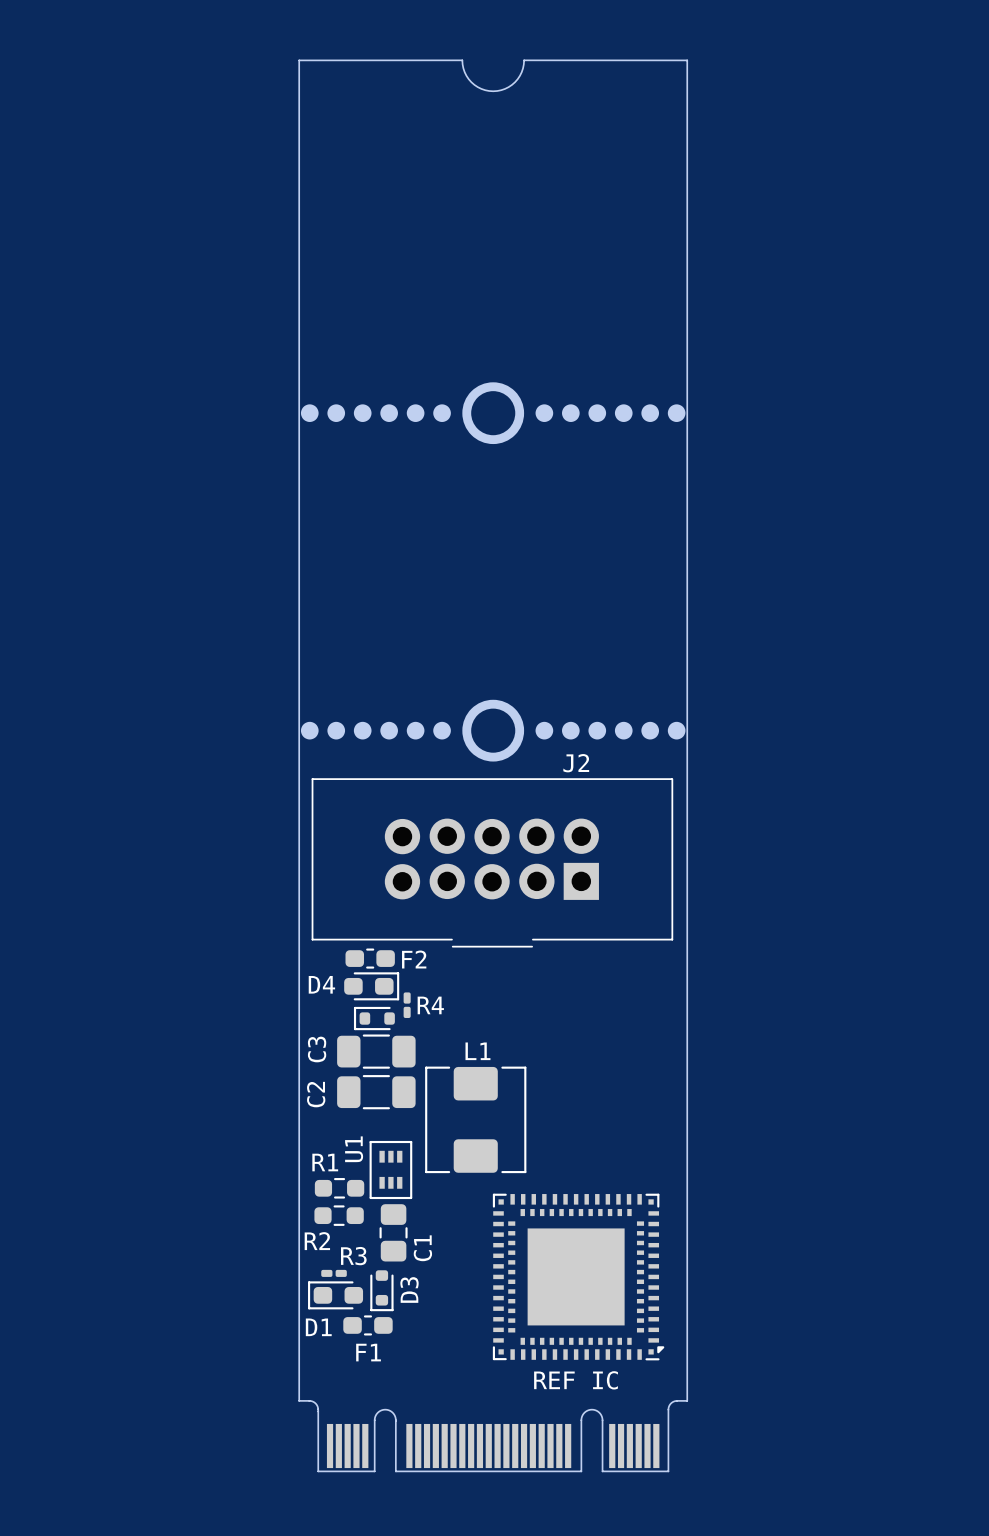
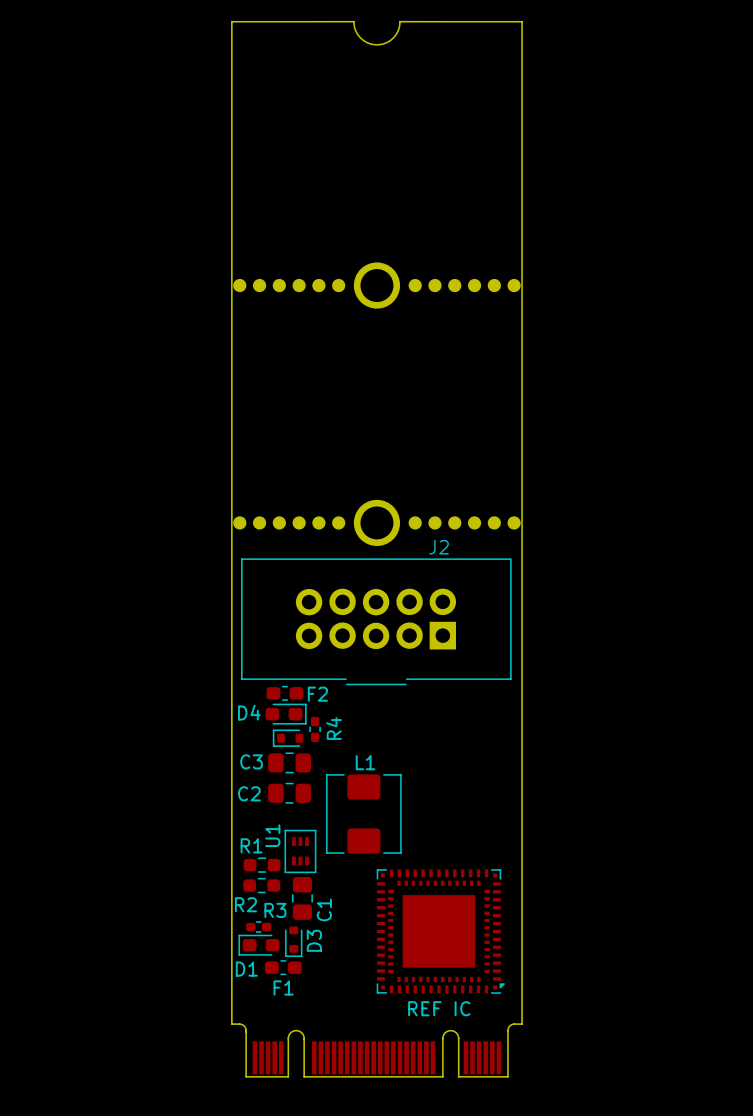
R4 footprint: [403, 992, 411, 1019] -> [309, 716, 321, 743]
C3 footprint: [337, 1034, 416, 1069] -> [268, 752, 312, 774]
C3 name rotation: 0° (317, 1049) -> 90° clockwise (251, 761)
C2 footprint: [337, 1075, 416, 1110] -> [268, 782, 312, 804]
C2 name rotation: 0° (316, 1094) -> 90° clockwise (249, 793)
R3 footprint: [321, 1269, 347, 1277] -> [246, 921, 272, 933]

